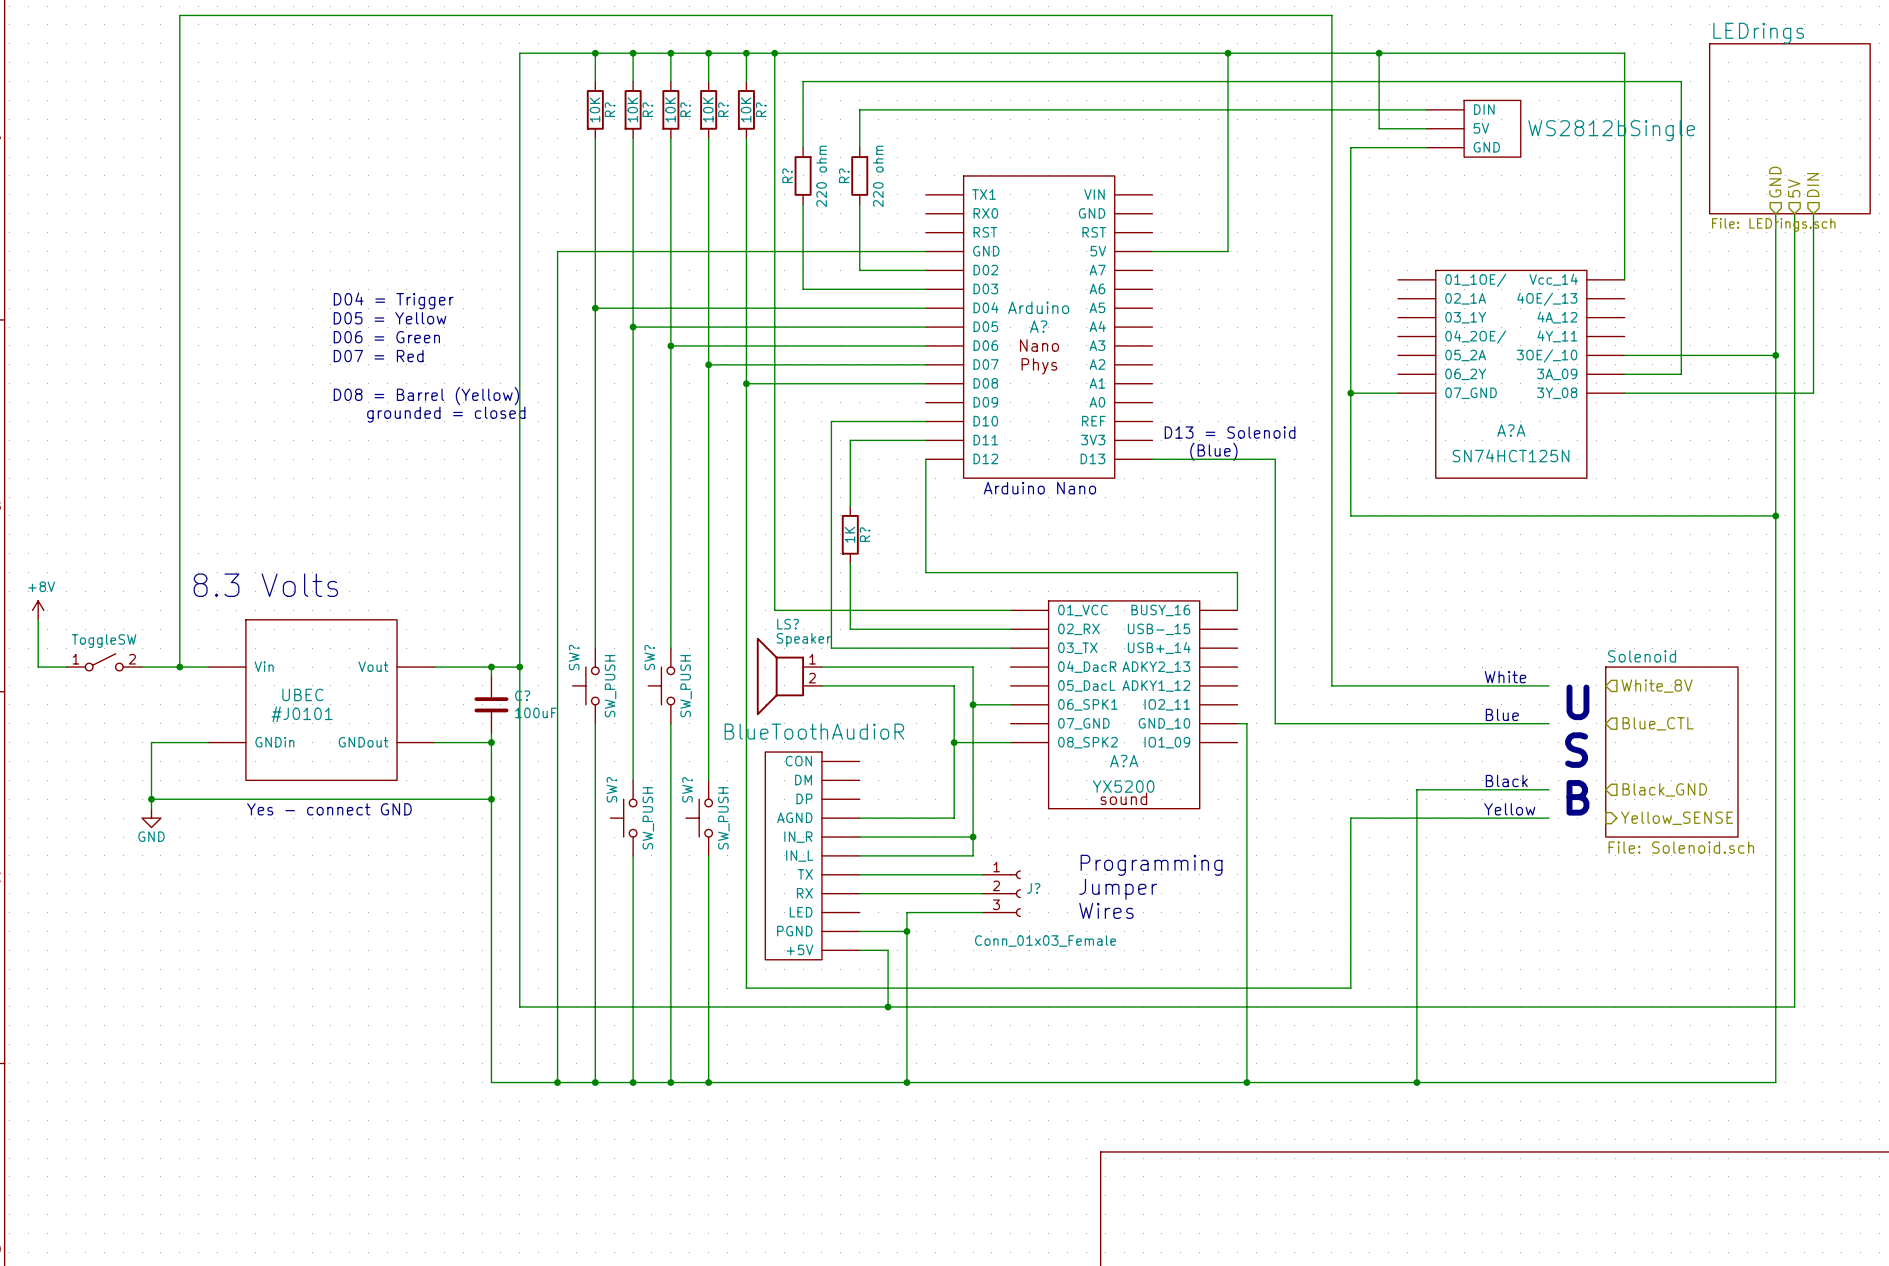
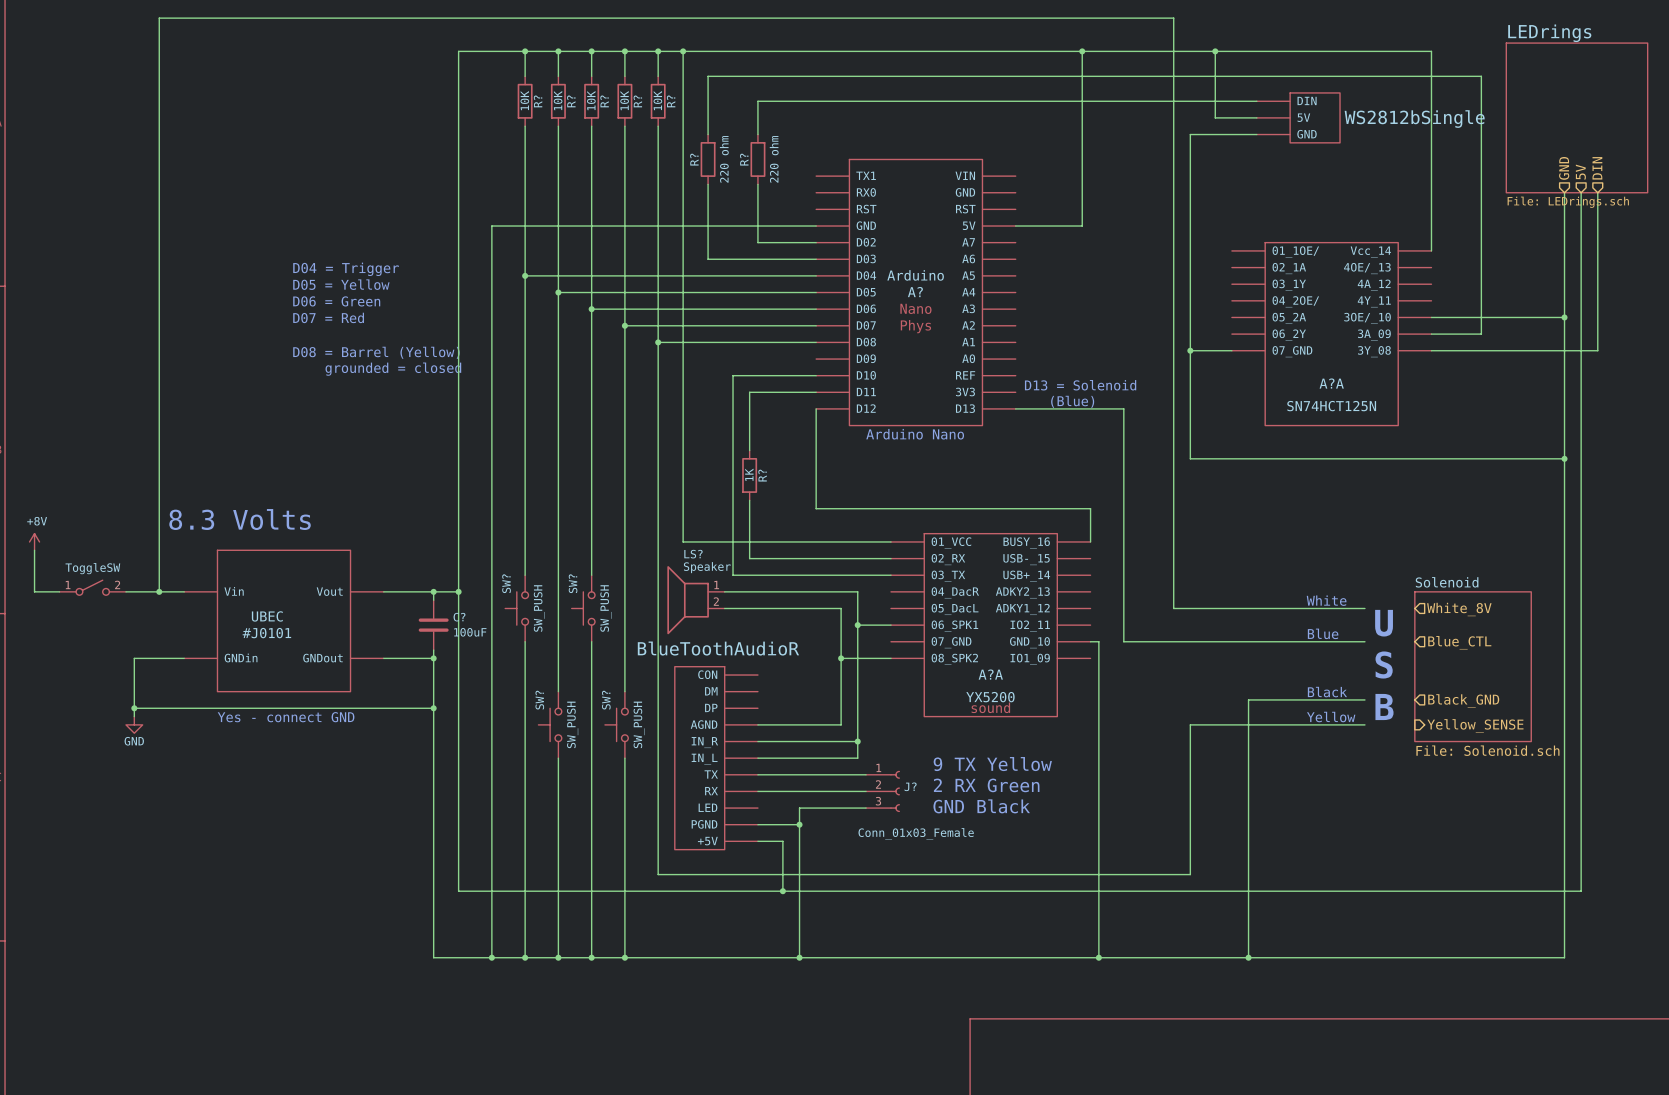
text: none -> 9 TX Yellow (992, 764)
text: Programming (1151, 865) -> none
text: none -> 2 RX Green (986, 785)
text: Jumper (1118, 889) -> none
text: Wires (1106, 910) -> none
text: none -> GND Black (981, 806)

